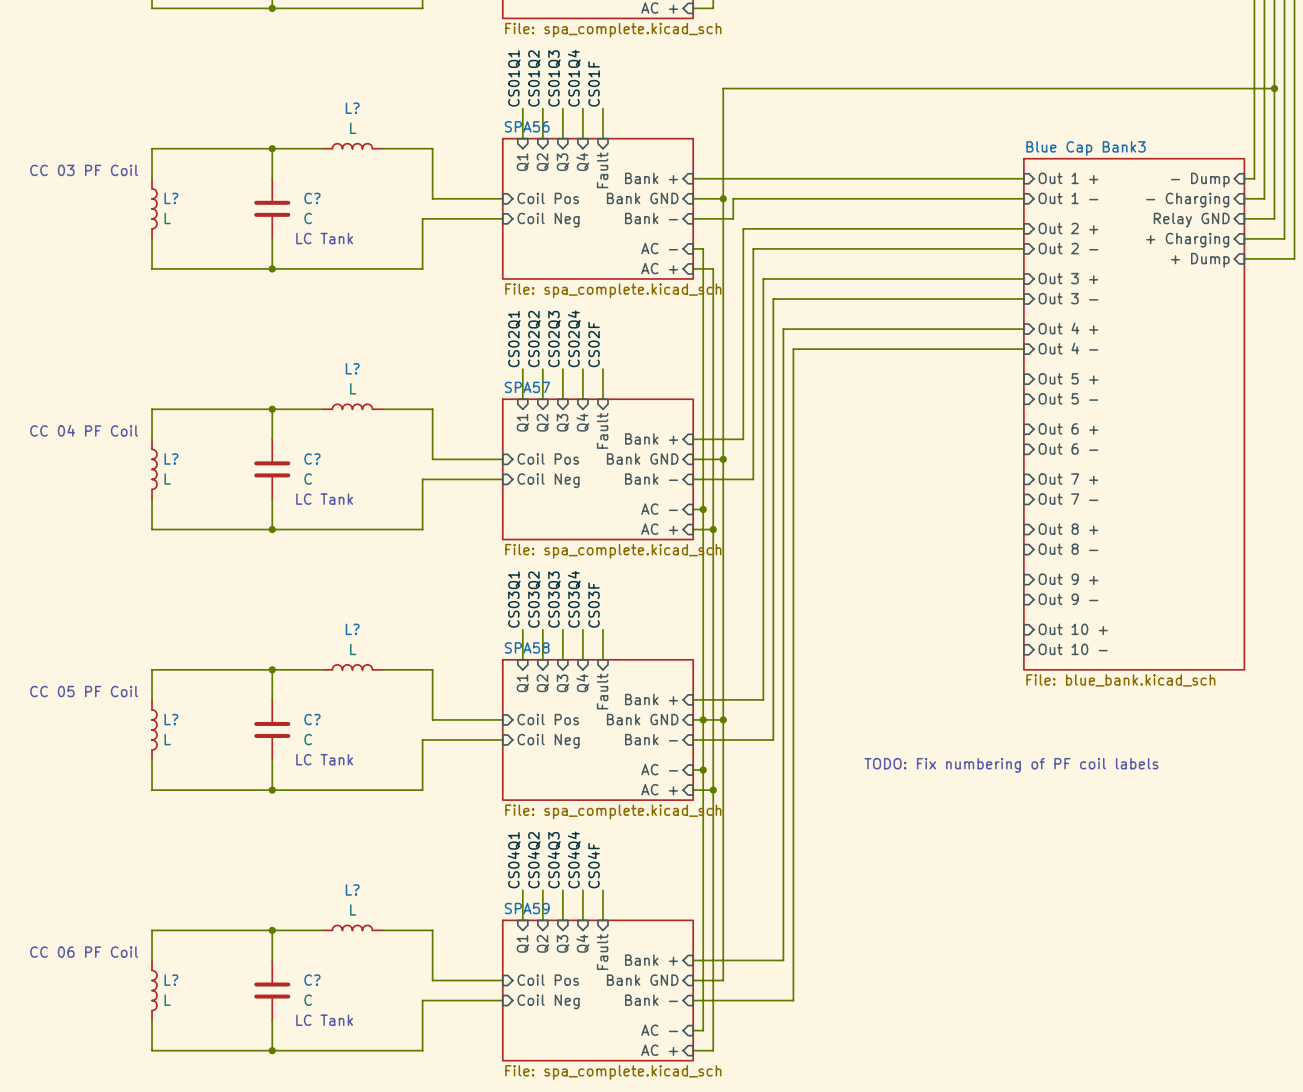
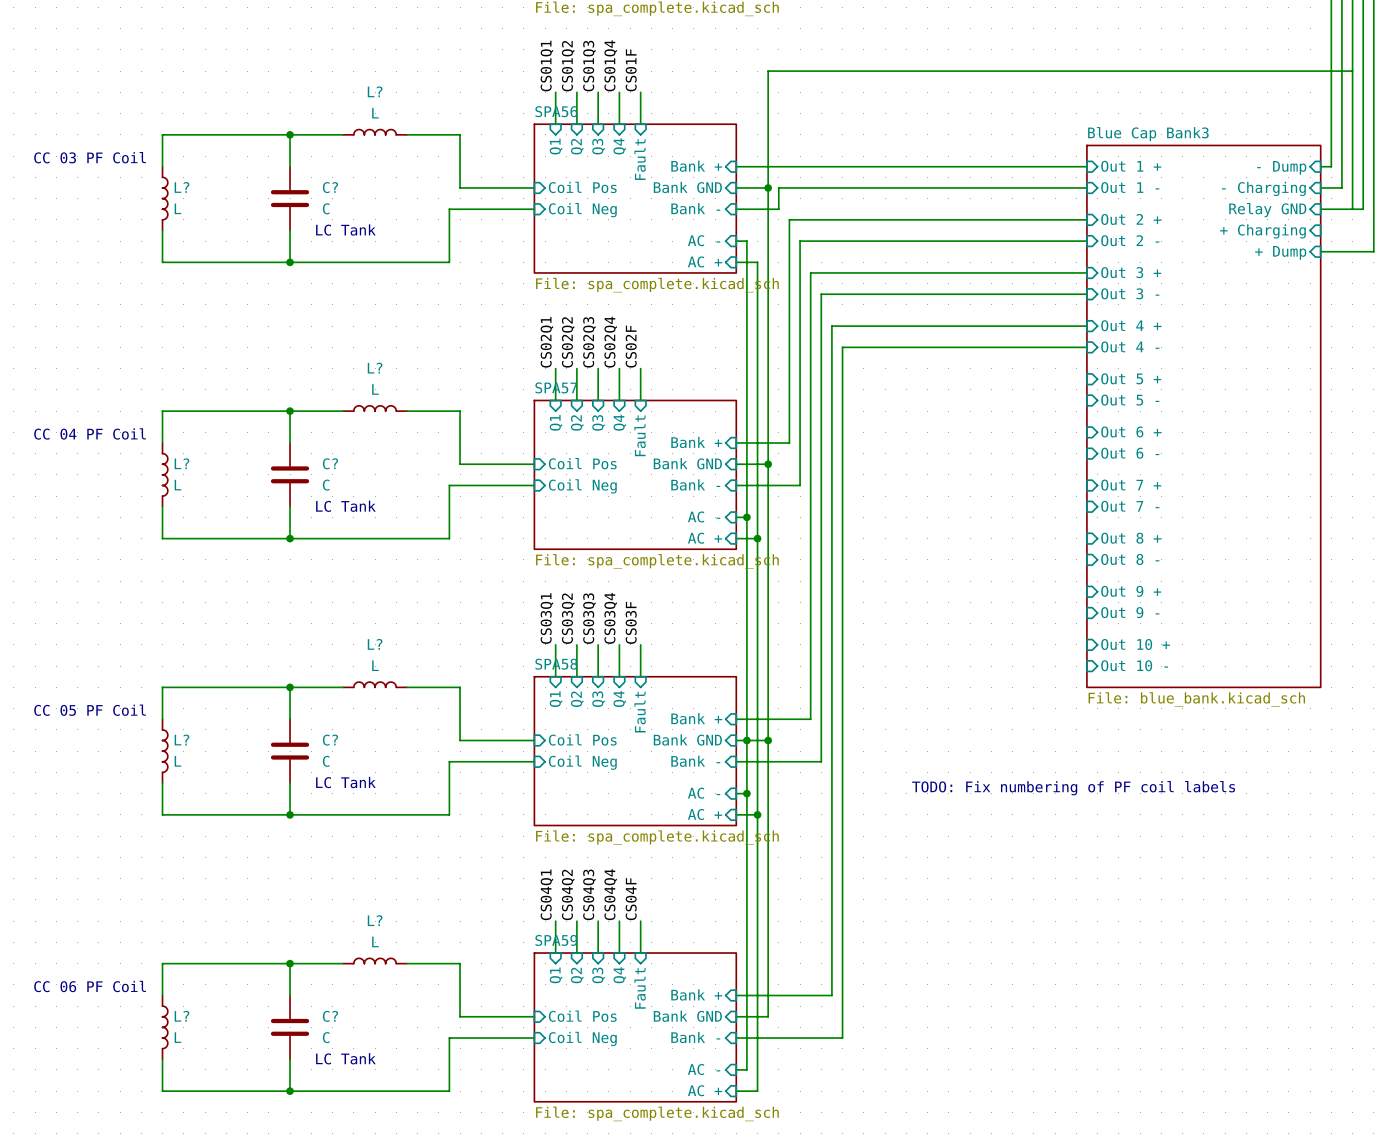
junction: (1274, 88) -> none
wire: (1284, 218) (1284, 238) (1244, 238) -> (1363, 209) (1352, 209)

